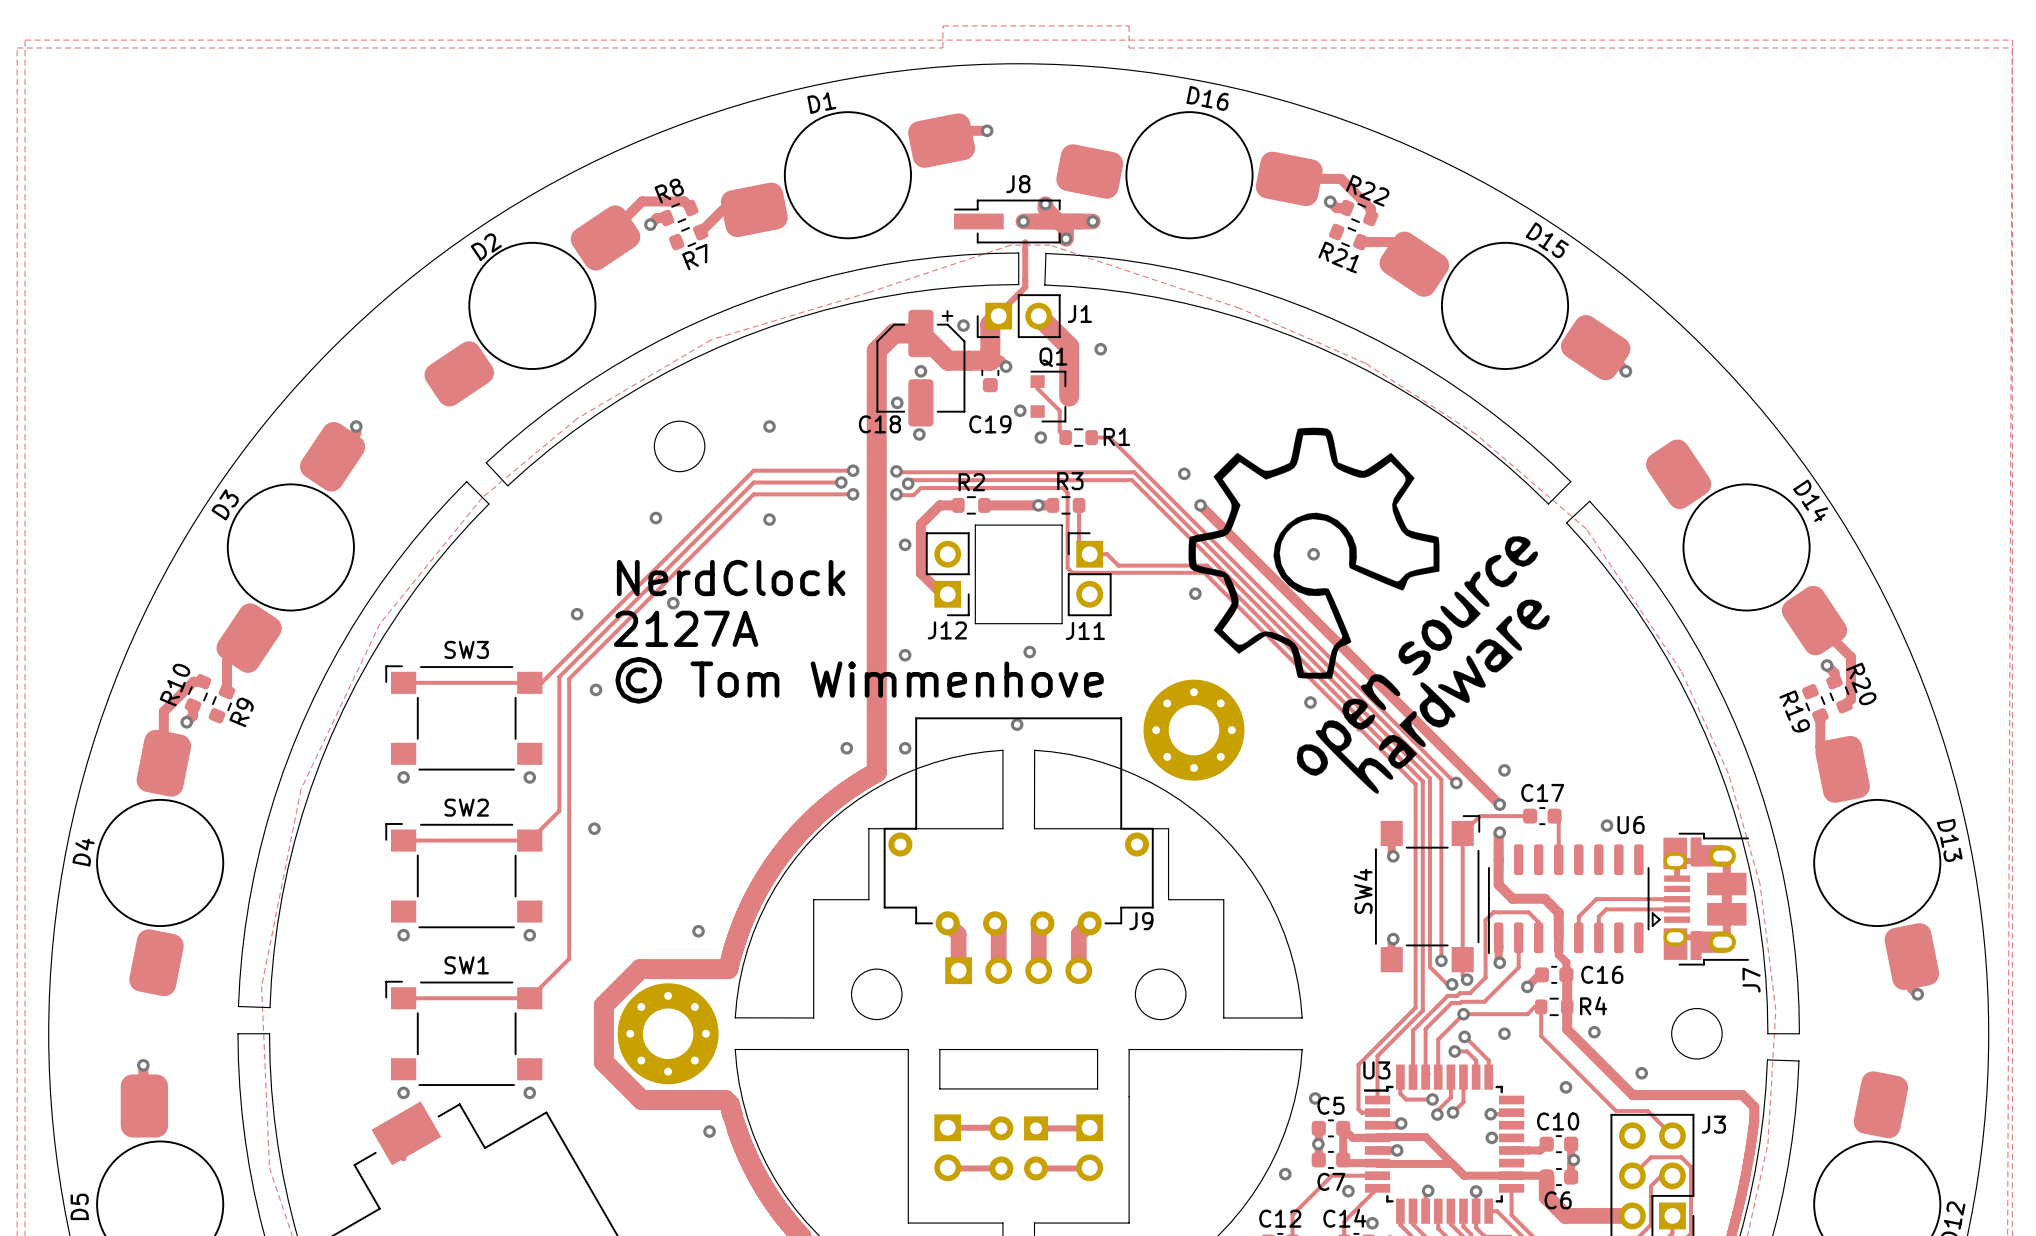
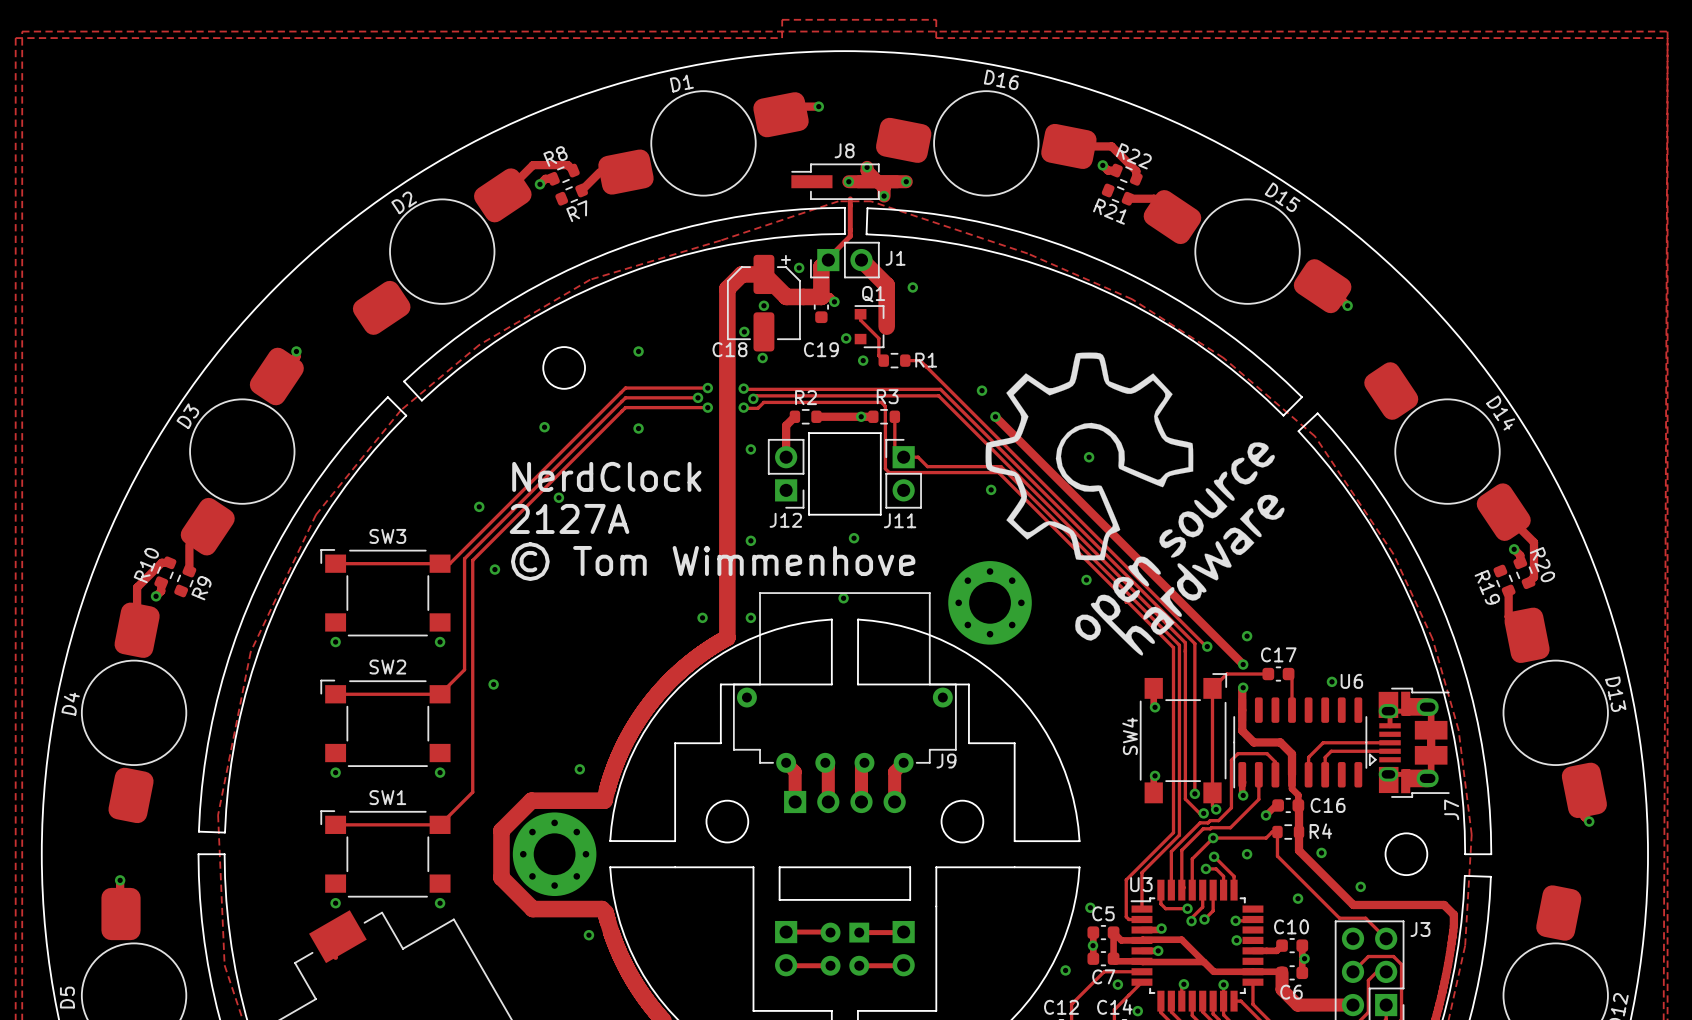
track: (958, 505) (939, 505) (920, 524) (920, 573) (941, 594) (947, 594) -> (794, 416) (786, 425) (786, 457)

